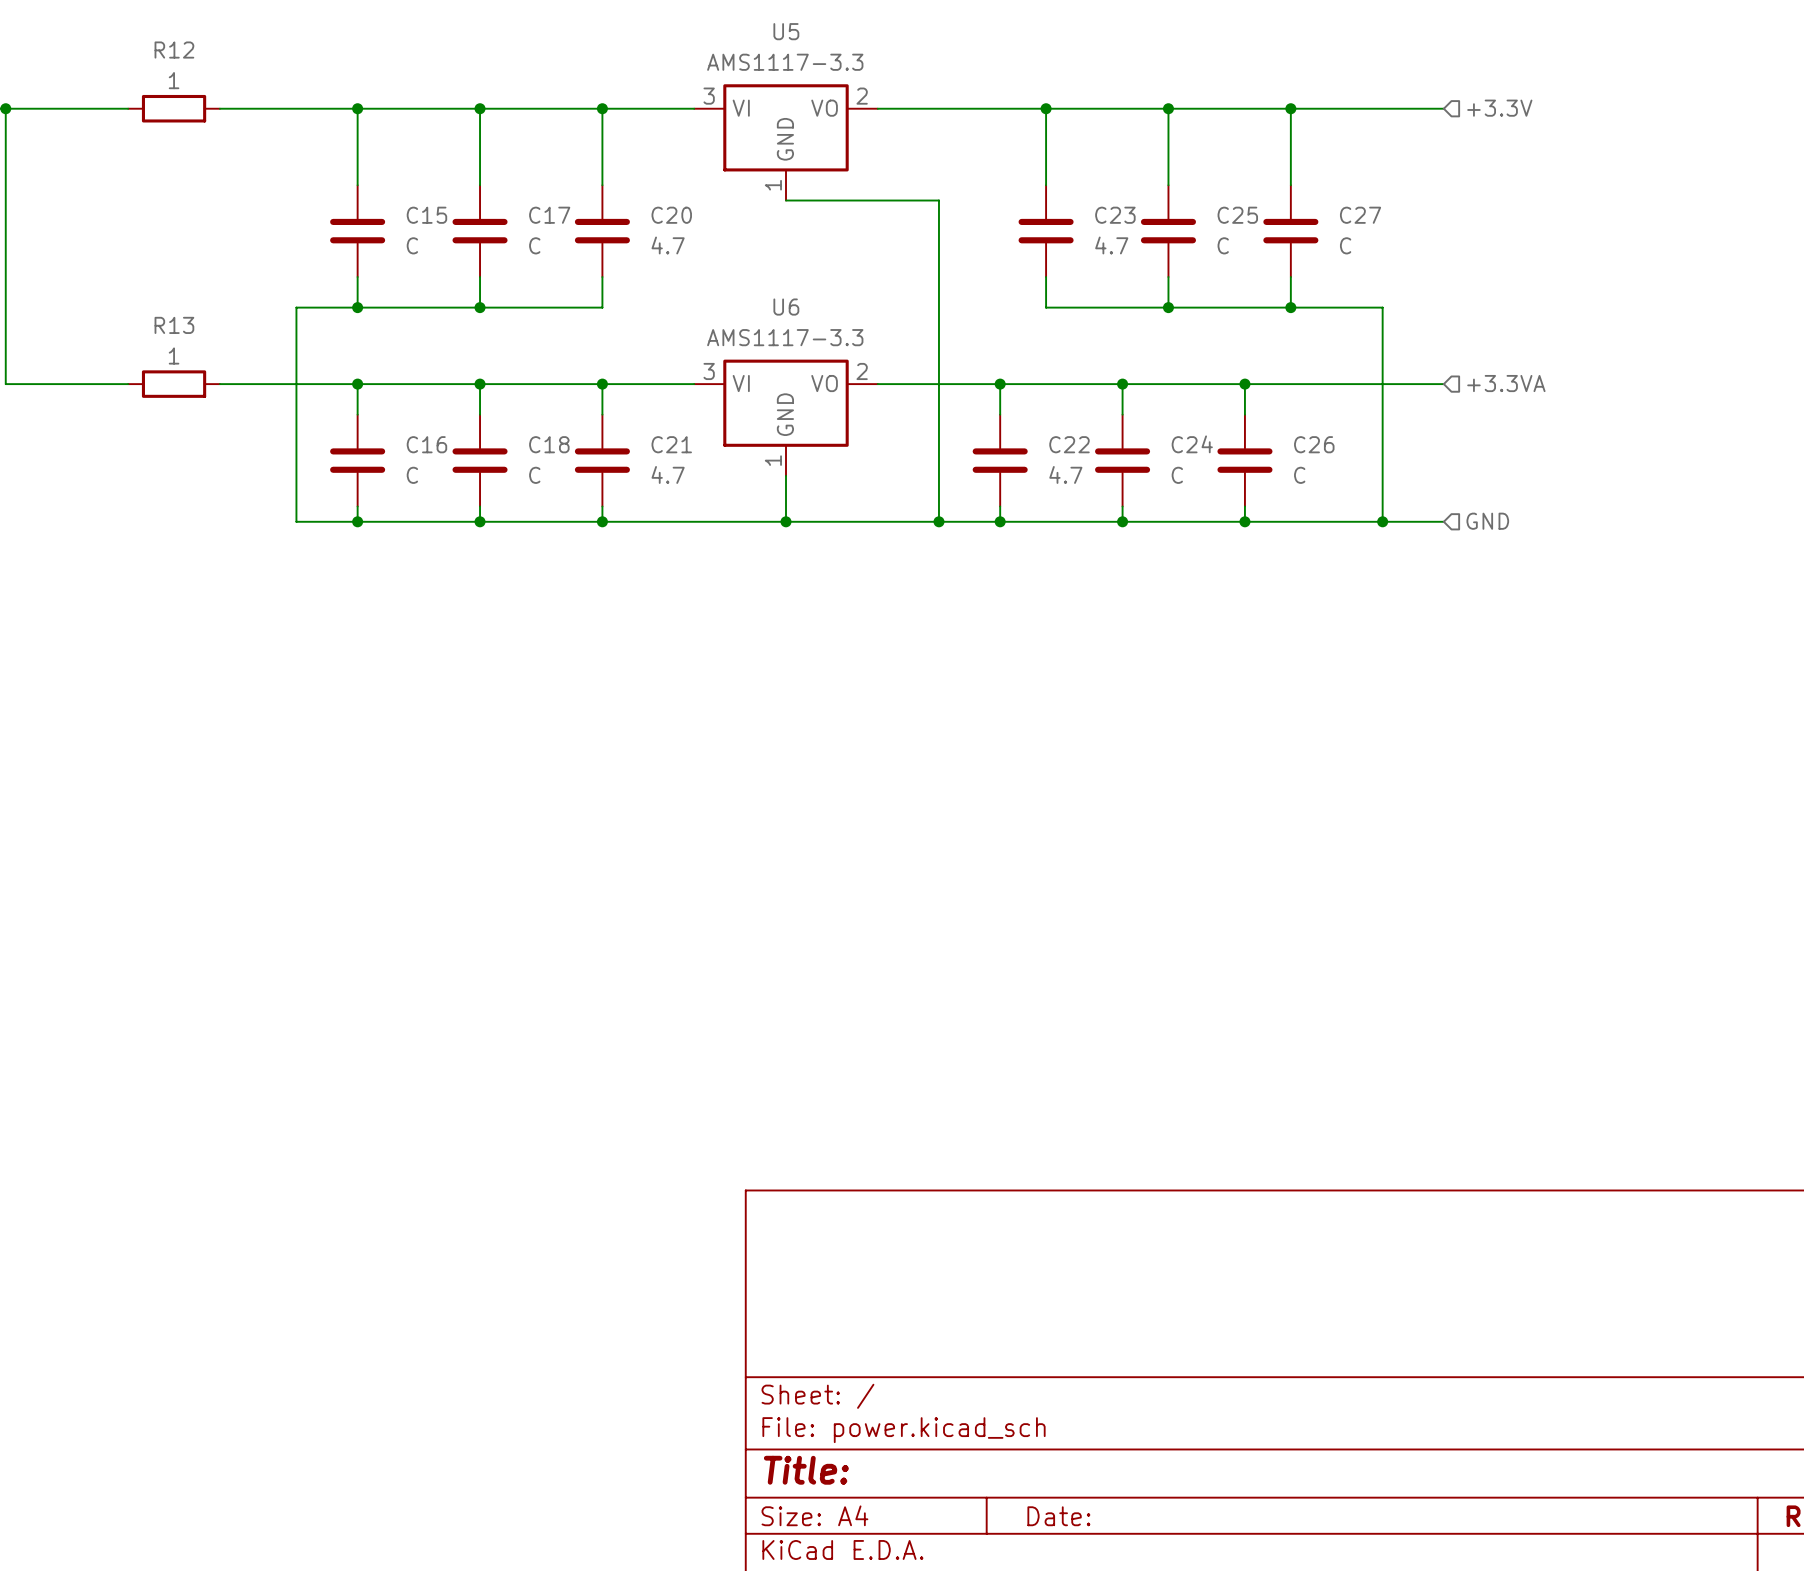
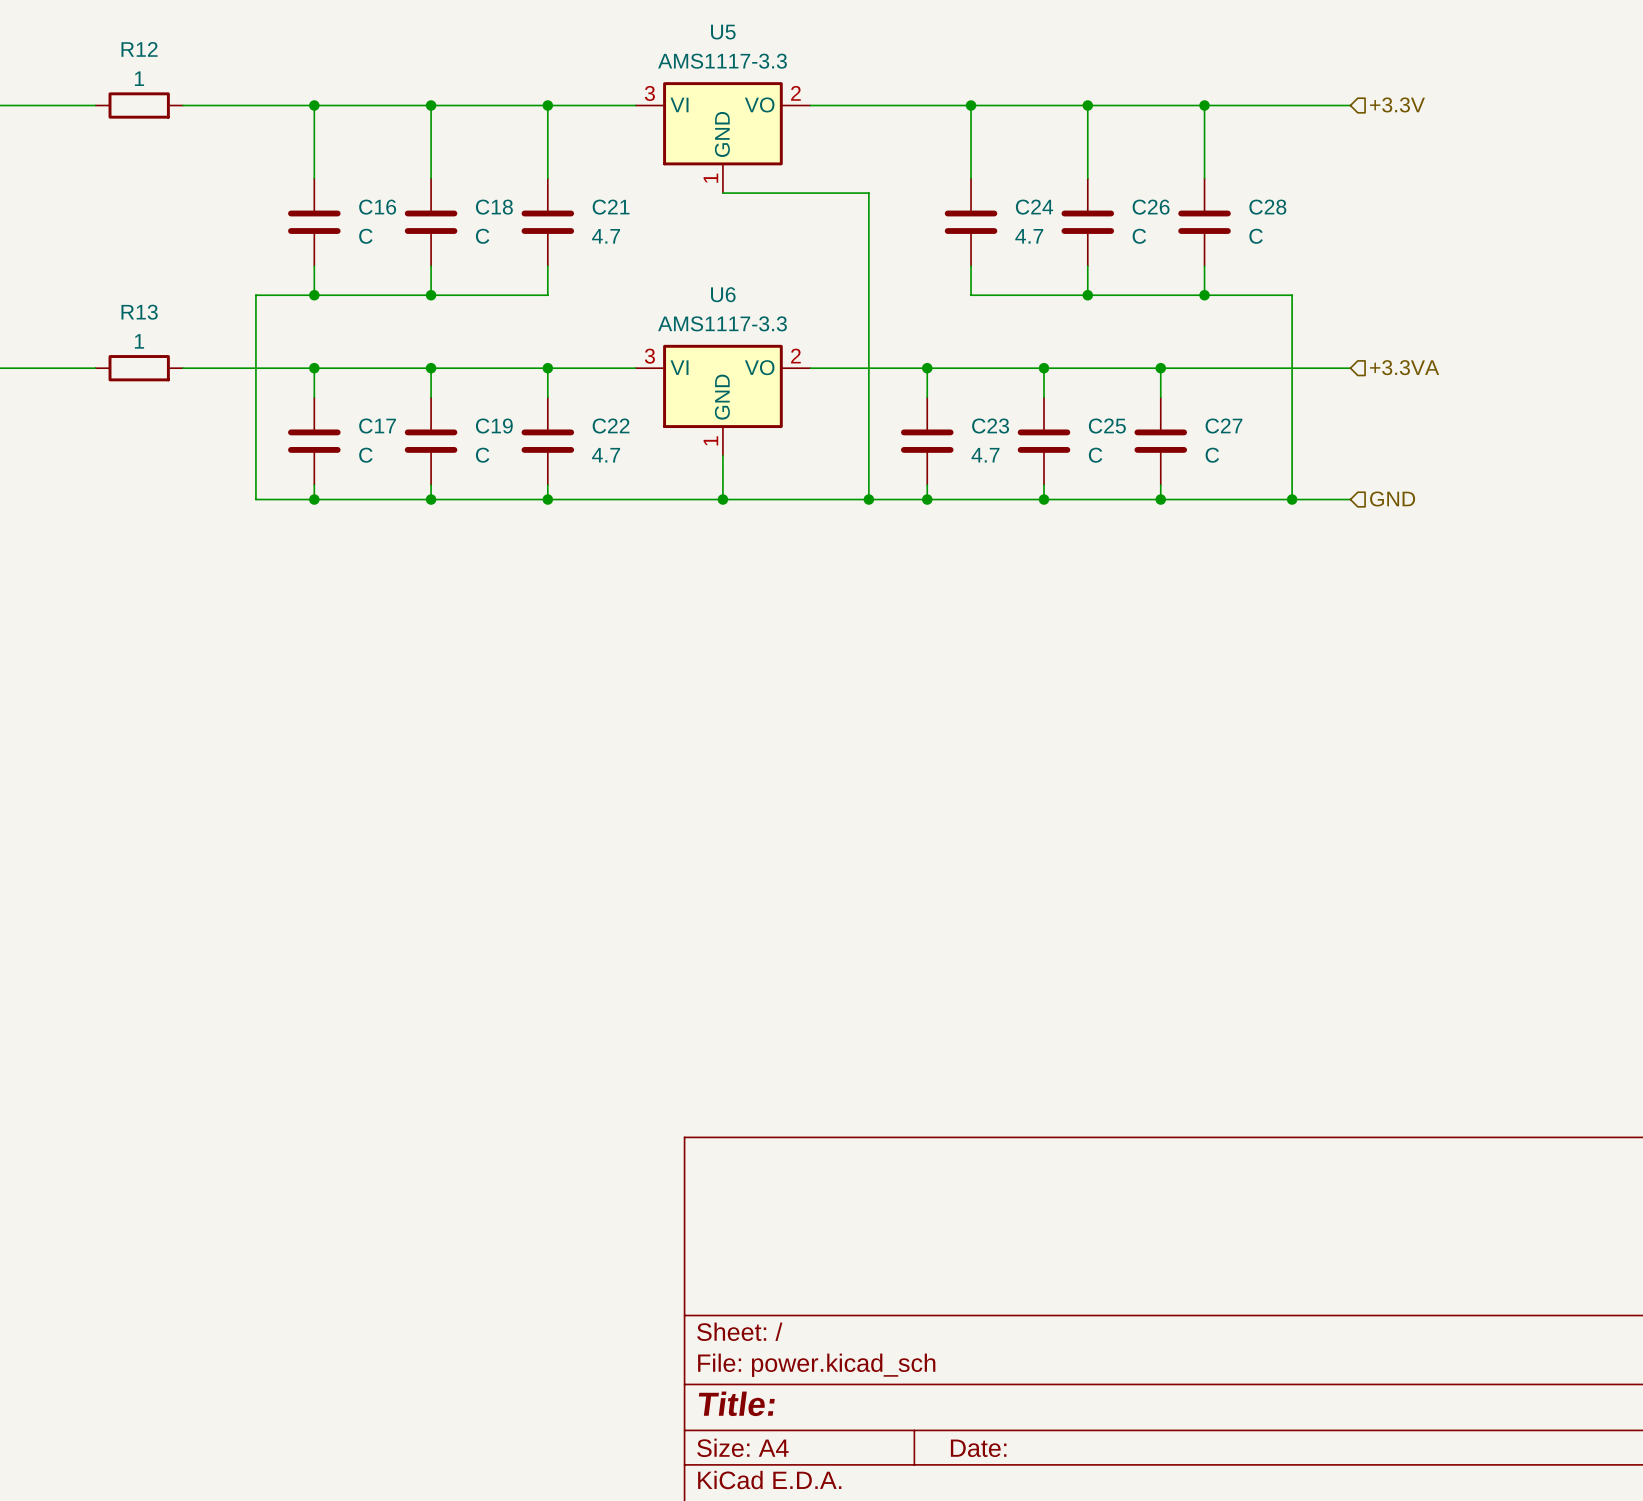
C15 name: C15 (426, 215) -> C16 (377, 207)
C17 name: C17 (549, 215) -> C18 (494, 207)
C20 name: C20 (671, 215) -> C21 (611, 207)
C23 name: C23 (1115, 215) -> C24 (1034, 207)
C25 name: C25 (1237, 215) -> C26 (1151, 207)
C27 name: C27 (1360, 215) -> C28 (1267, 207)
C16 name: C16 (426, 444) -> C17 (377, 426)
C18 name: C18 (549, 444) -> C19 (494, 426)
C21 name: C21 (671, 444) -> C22 (611, 426)
C22 name: C22 (1069, 444) -> C23 (990, 426)
C24 name: C24 (1192, 444) -> C25 (1107, 426)
C26 name: C26 (1314, 444) -> C27 (1223, 426)

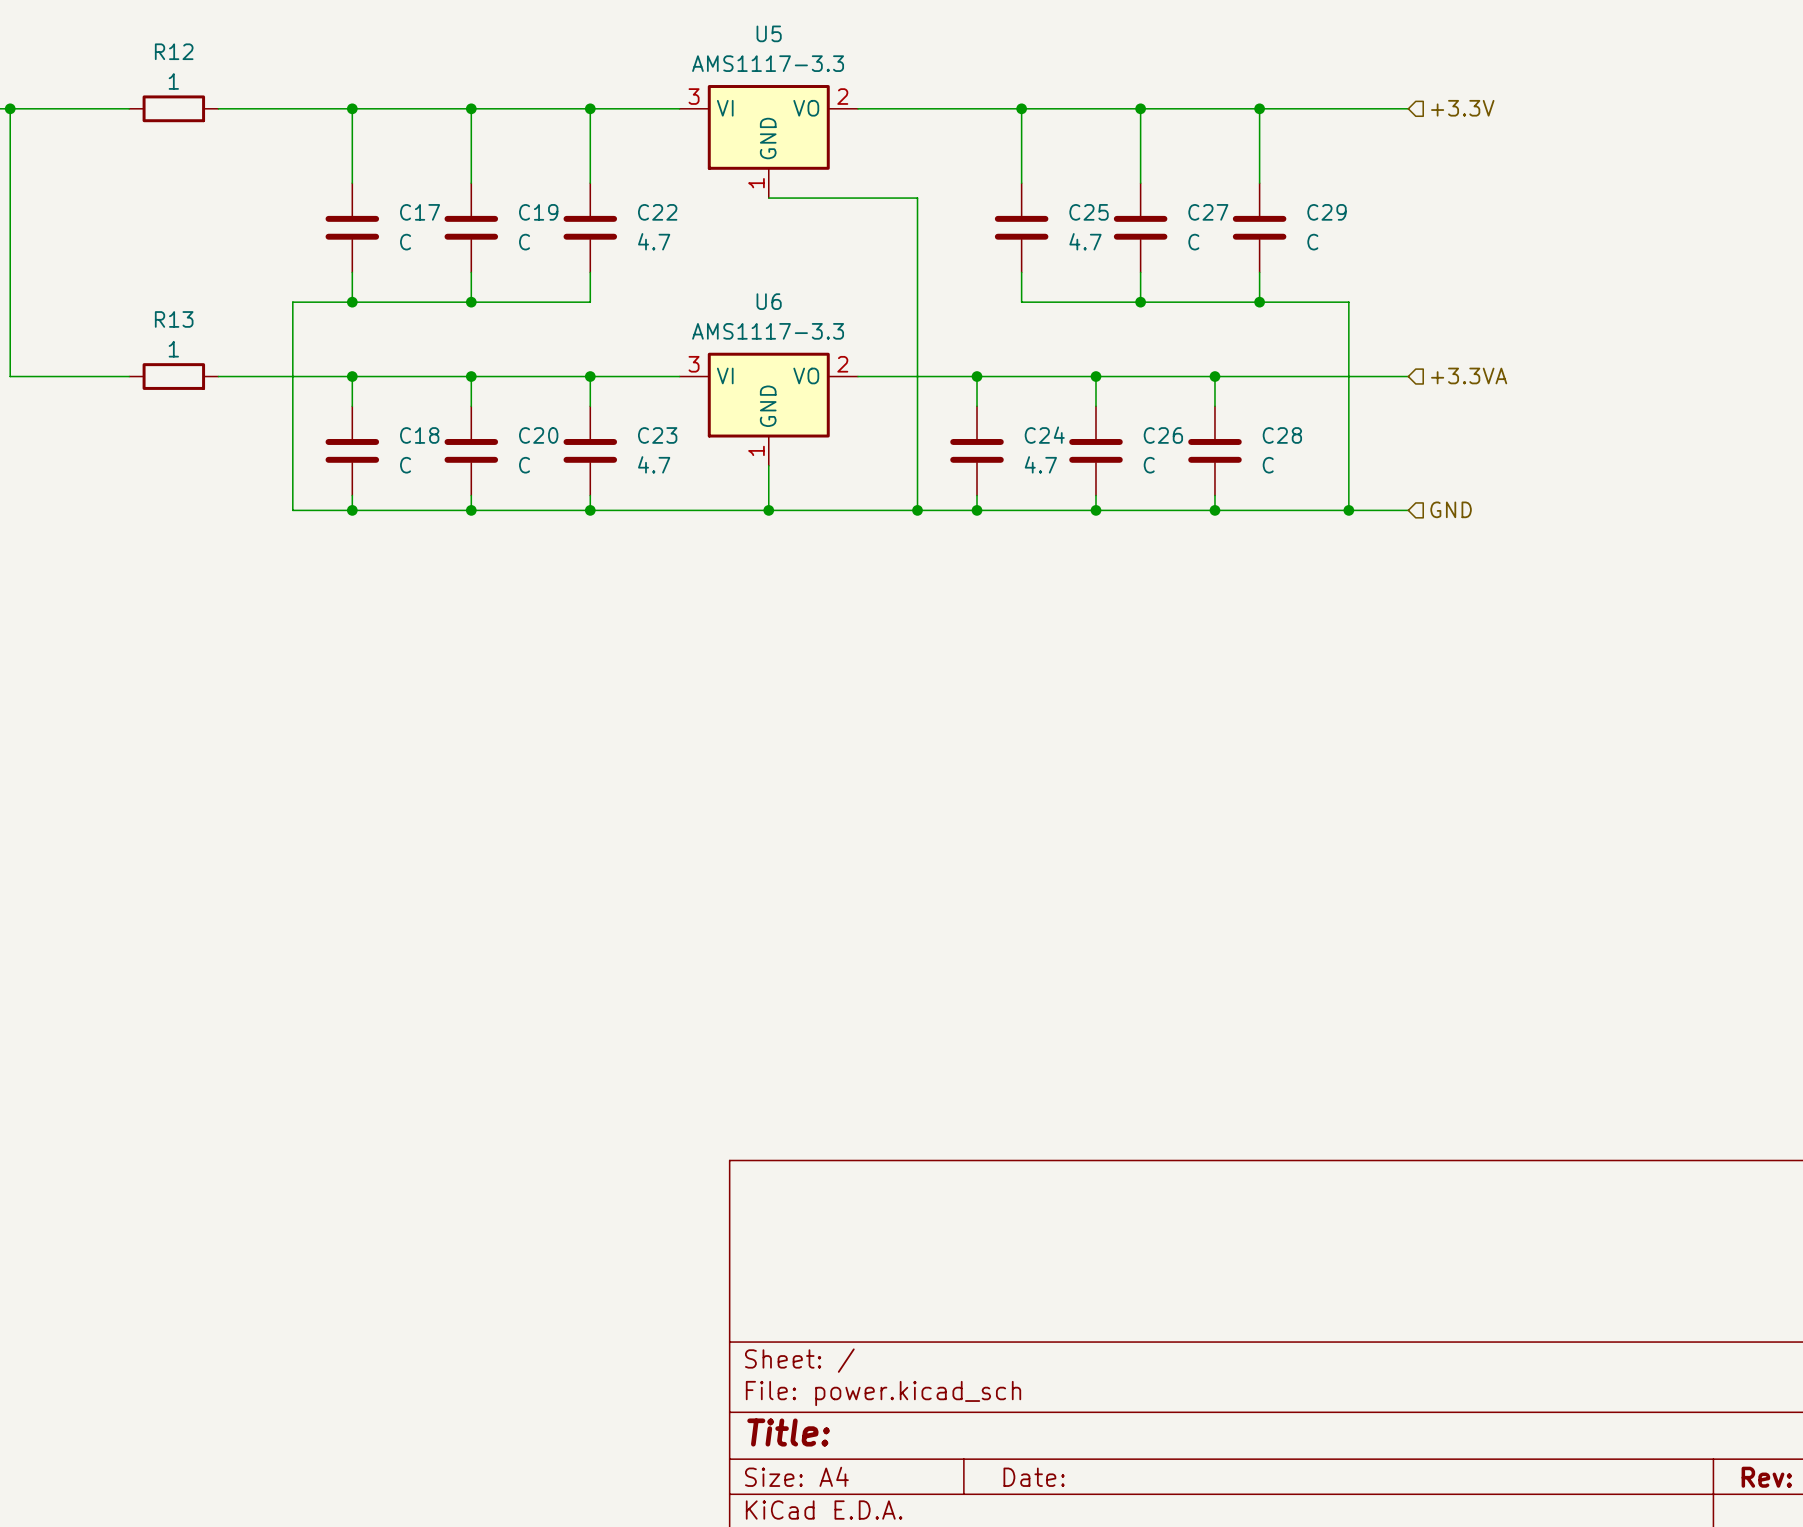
C16 name: C16 (377, 207) -> C17 (420, 212)
C18 name: C18 (494, 207) -> C19 (538, 212)
C21 name: C21 (611, 207) -> C22 (657, 212)
C24 name: C24 (1034, 207) -> C25 (1089, 212)
C26 name: C26 (1151, 207) -> C27 (1208, 212)
C28 name: C28 (1267, 207) -> C29 (1327, 212)
C17 name: C17 (377, 426) -> C18 (419, 435)
C19 name: C19 (494, 426) -> C20 (538, 435)
C22 name: C22 (611, 426) -> C23 (657, 435)
C23 name: C23 (990, 426) -> C24 (1044, 435)
C25 name: C25 (1107, 426) -> C26 (1163, 435)
C27 name: C27 (1223, 426) -> C28 (1282, 435)

